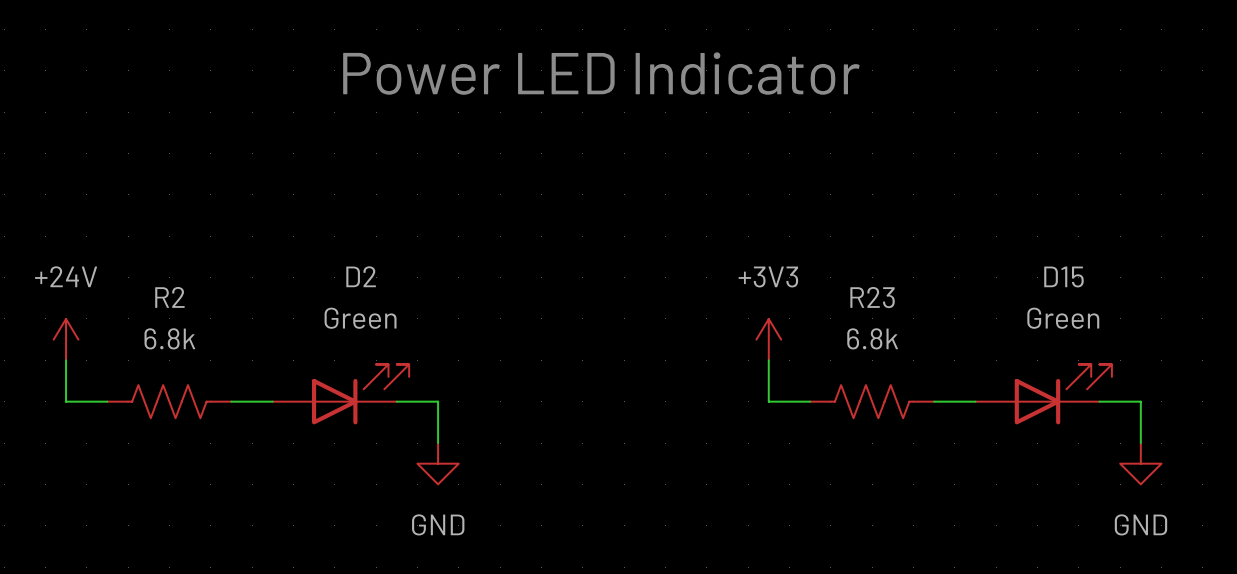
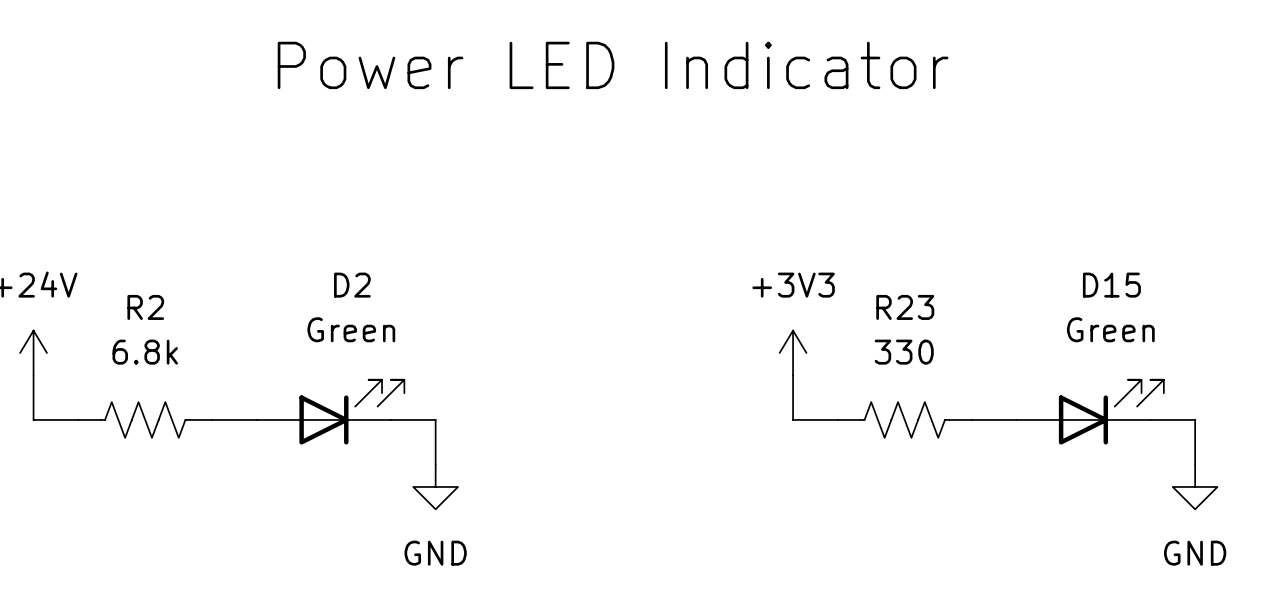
R23 value: 6.8k (872, 338) -> 330 (904, 352)

